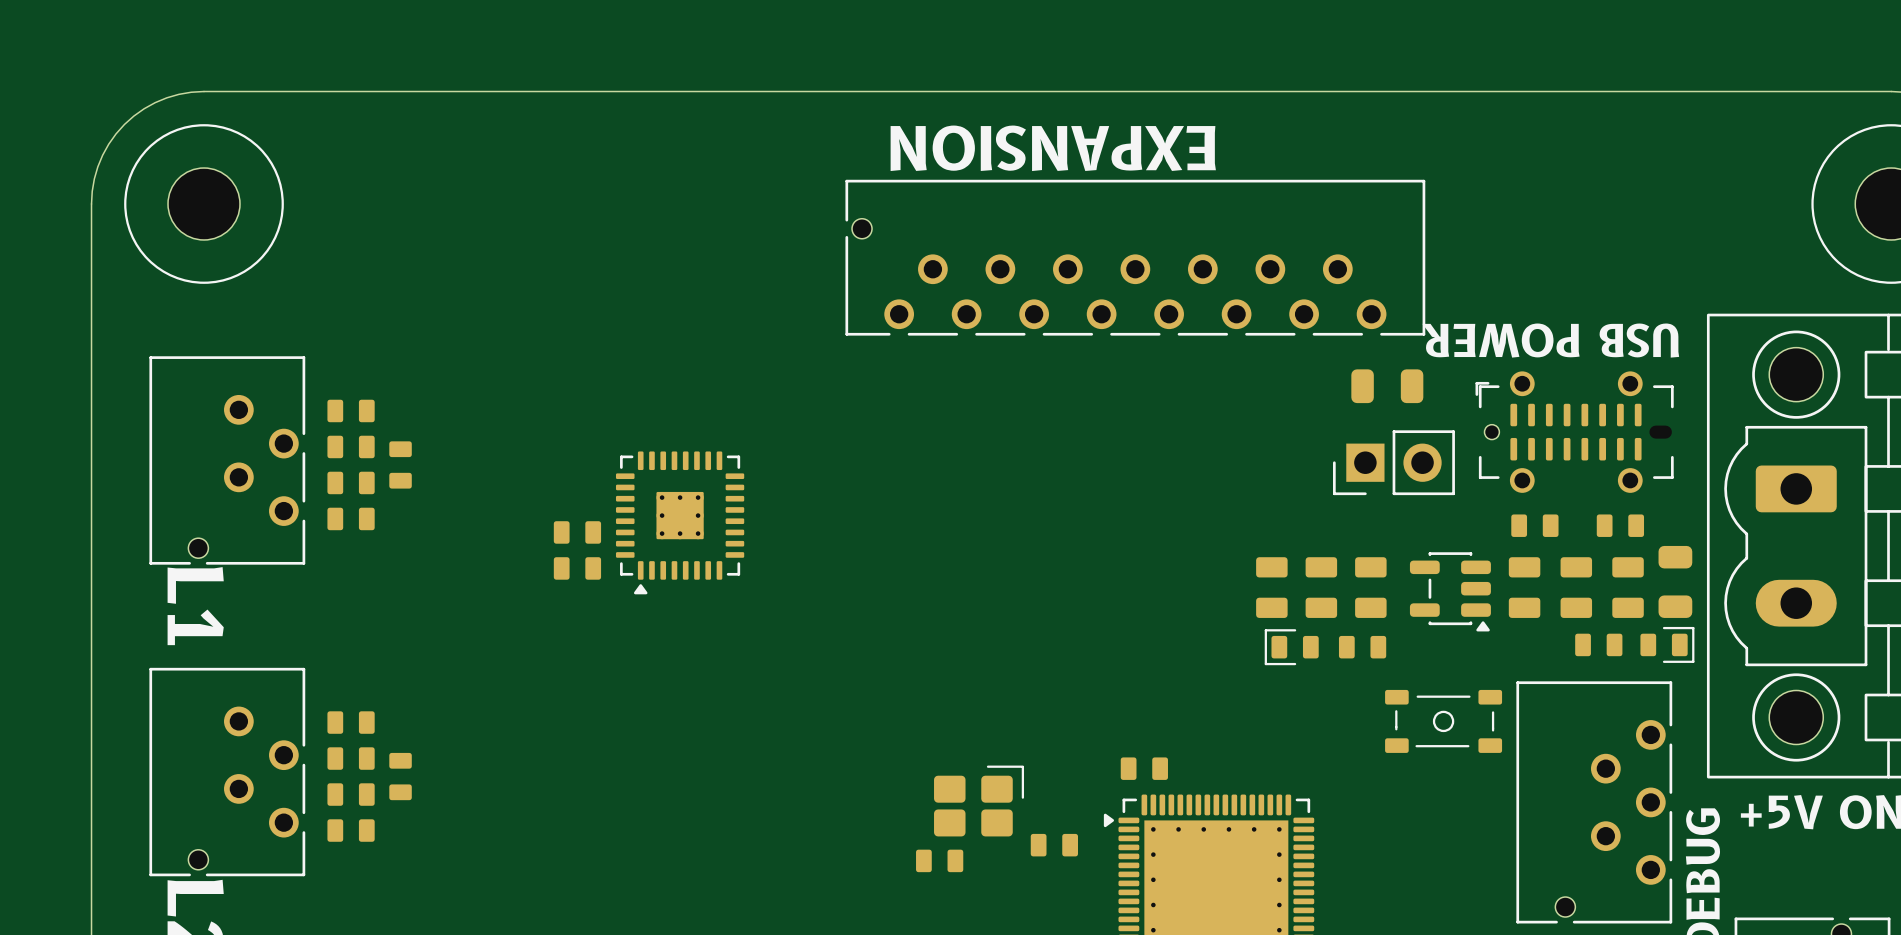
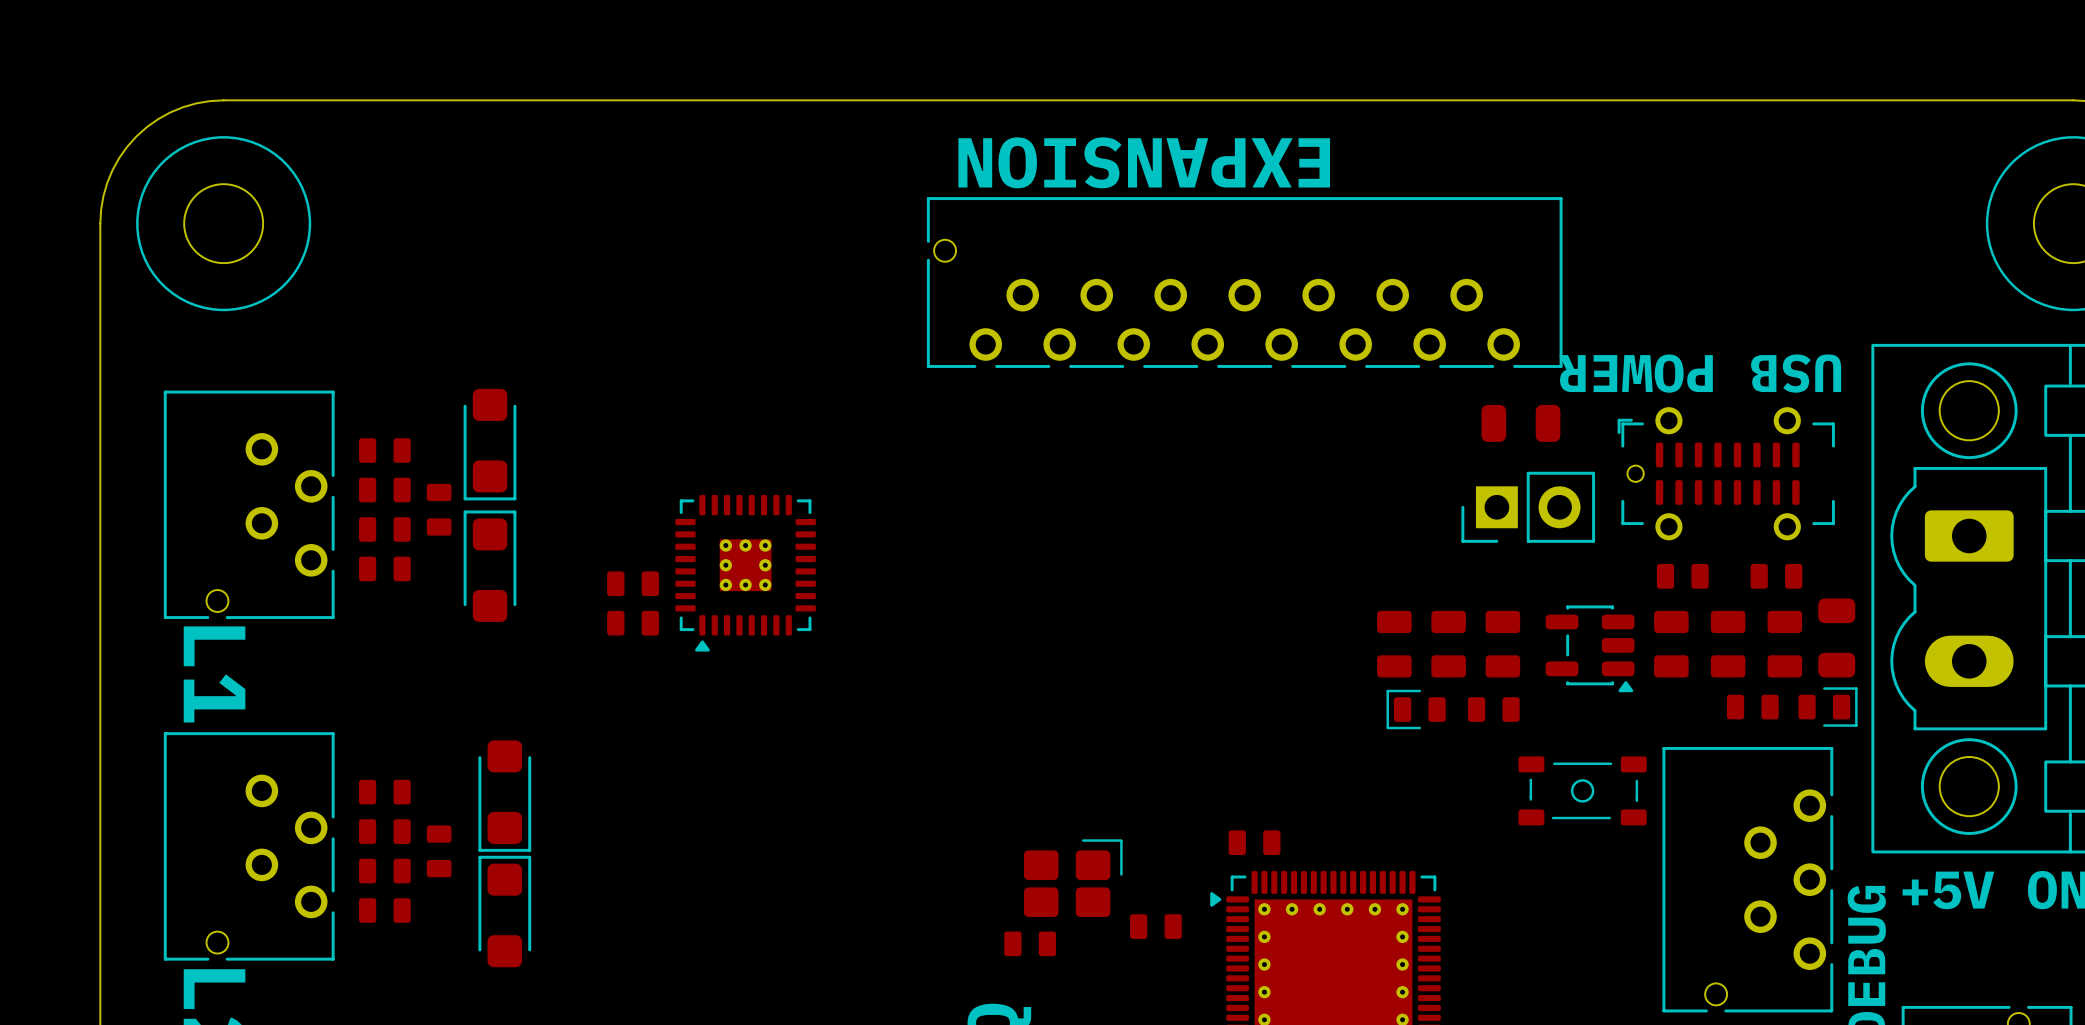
part: none -> (490, 444)
part: none -> (490, 566)
part: none -> (504, 796)
part: none -> (504, 911)

